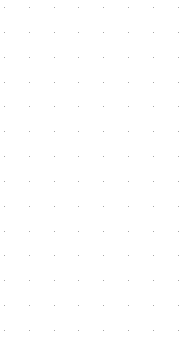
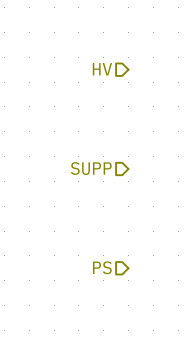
hierarchical label: none -> HV (102, 69)
hierarchical label: none -> SUPP (91, 168)
hierarchical label: none -> PS (102, 267)

